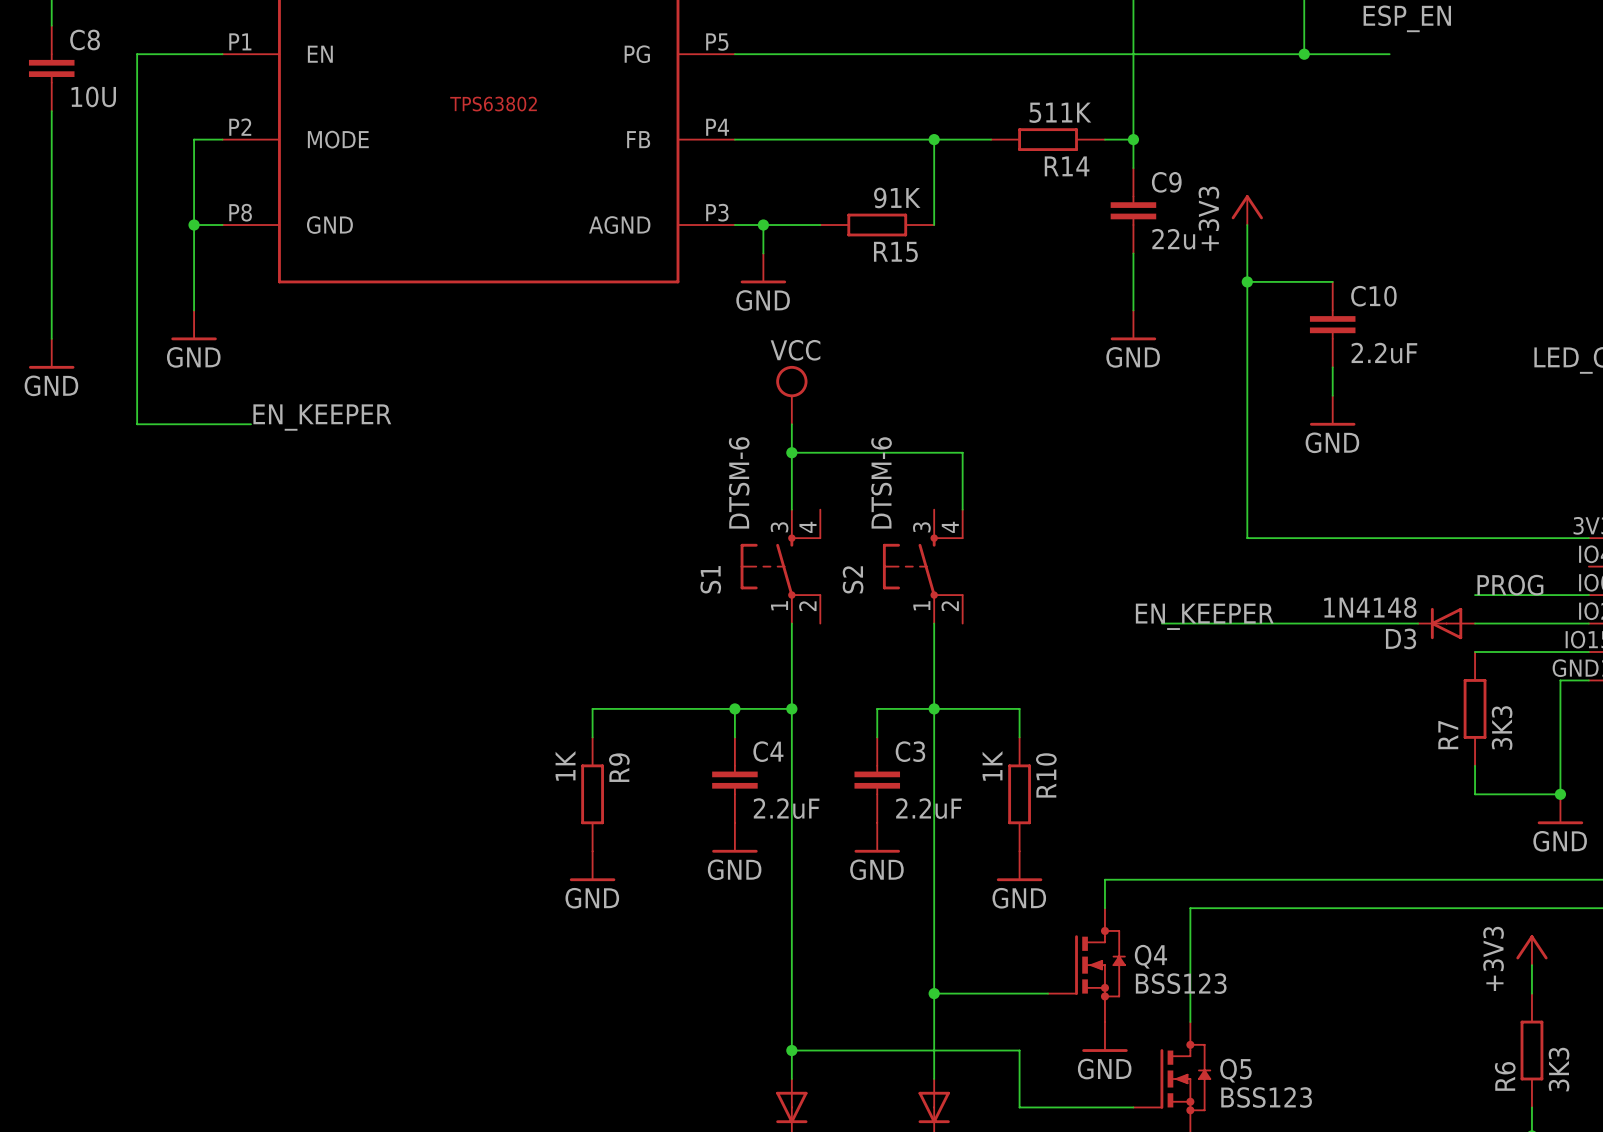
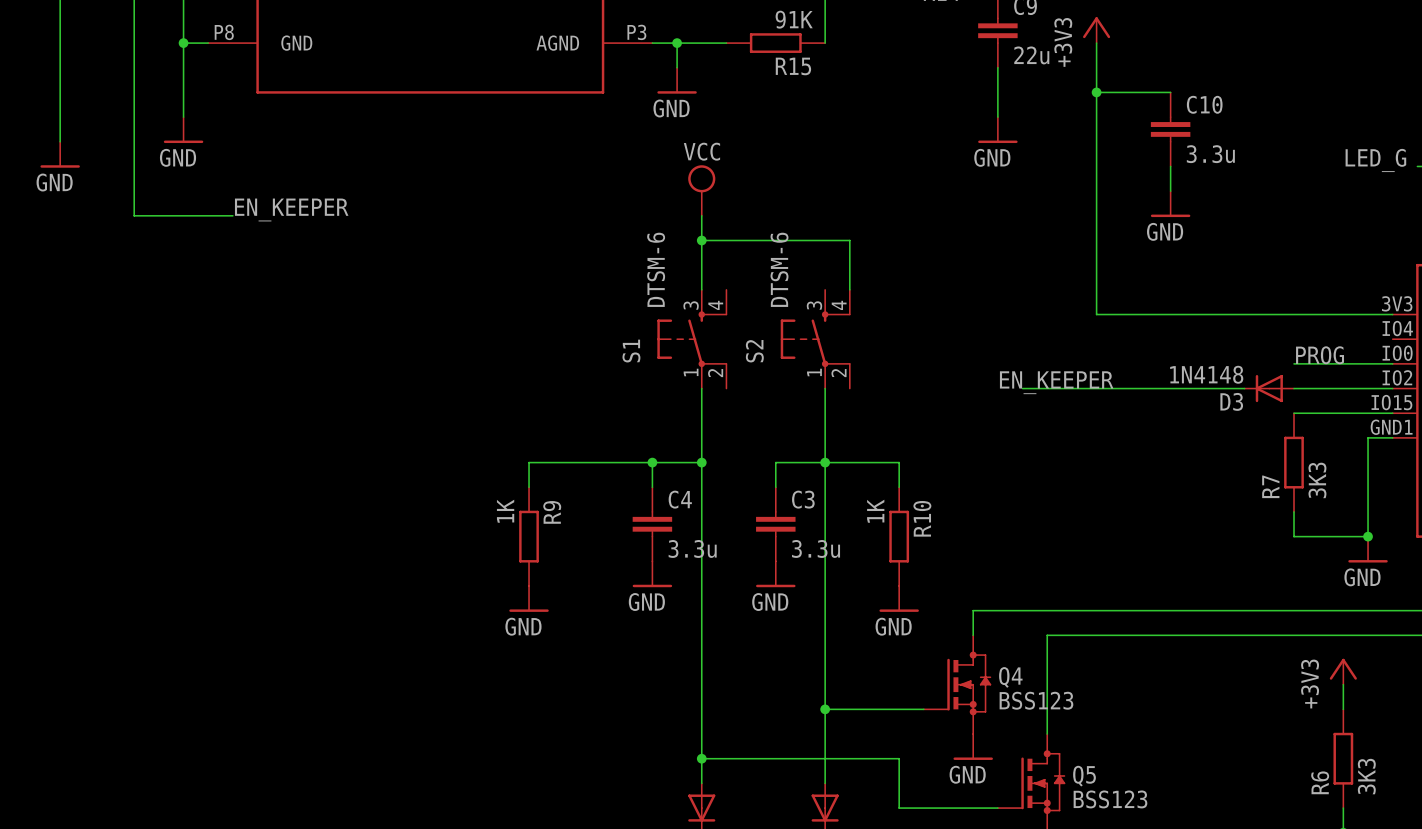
C10 value: 2.2uF (1384, 353) -> 3.3u (1210, 154)
C4 value: 2.2uF (786, 808) -> 3.3u (692, 548)
C3 value: 2.2uF (928, 808) -> 3.3u (816, 548)

